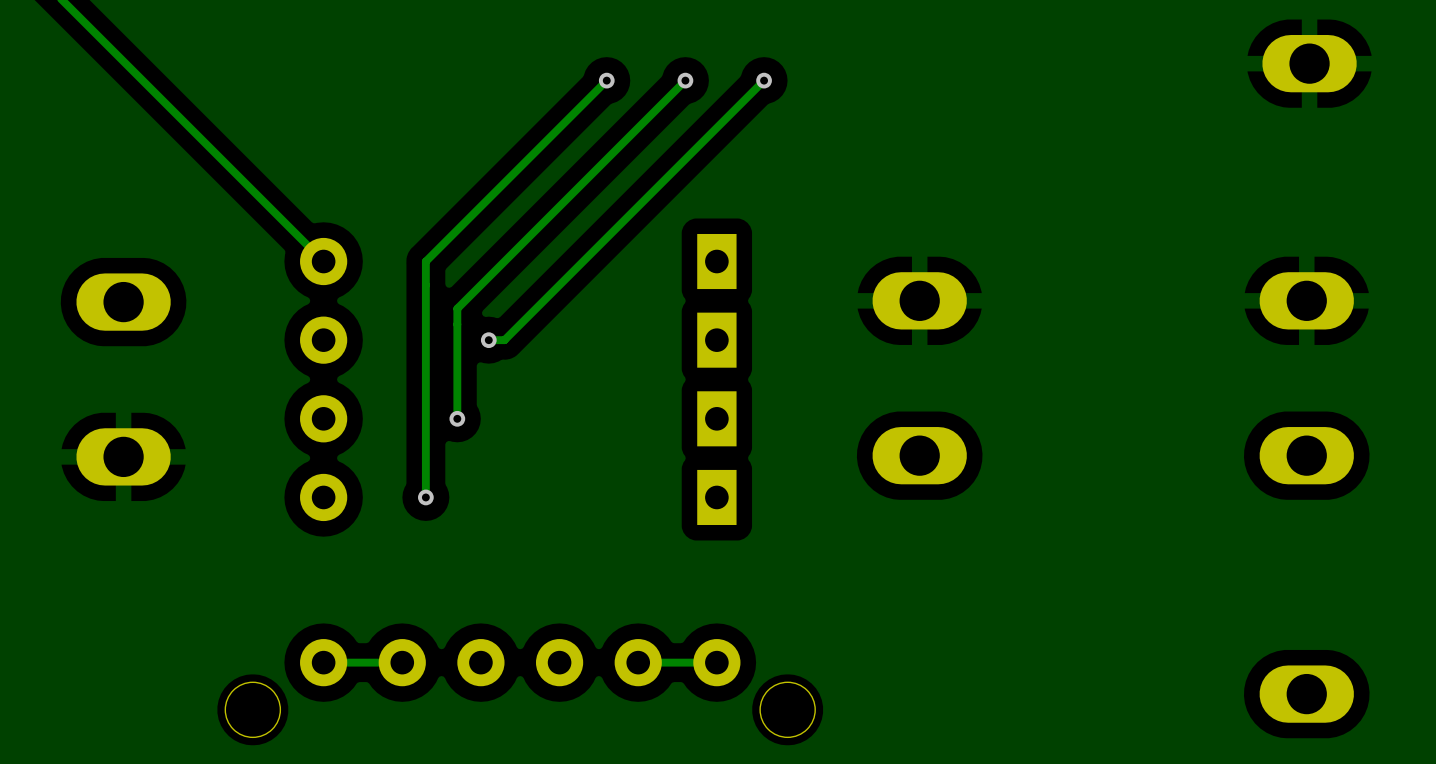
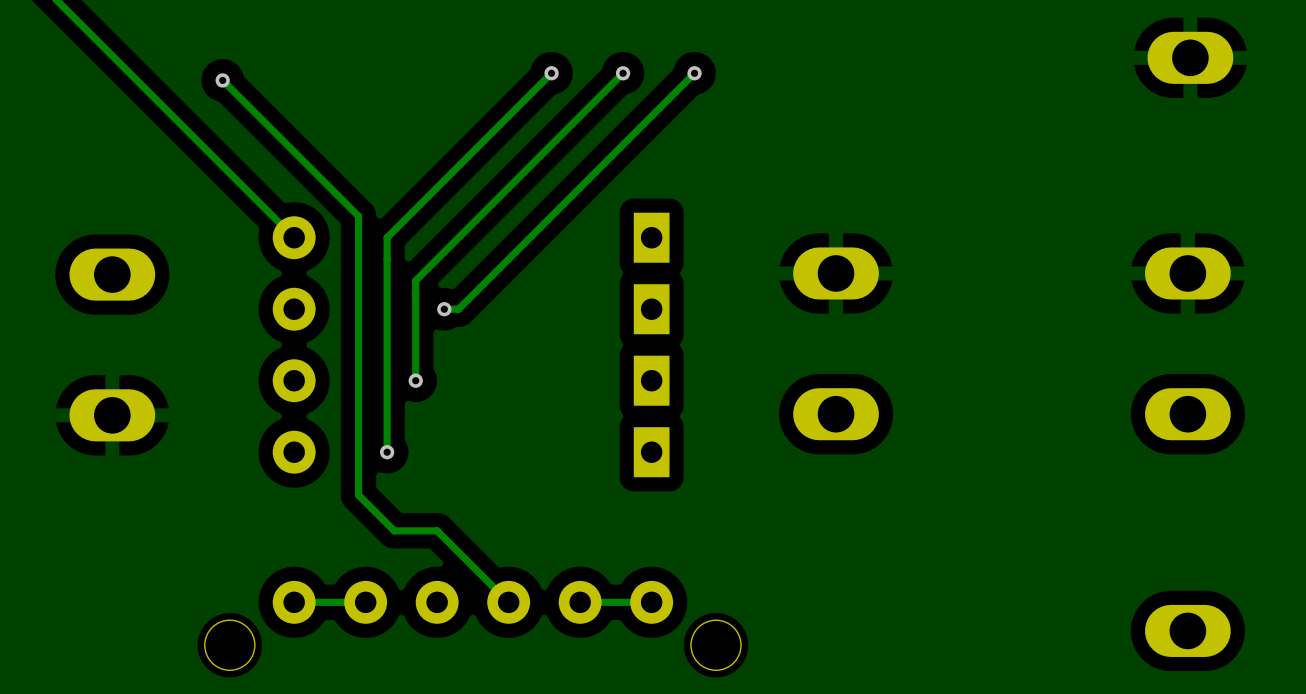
track: none -> (222, 80) (358, 216) (358, 495) (394, 530) (437, 530) (508, 602)
via: none -> (222, 80)

